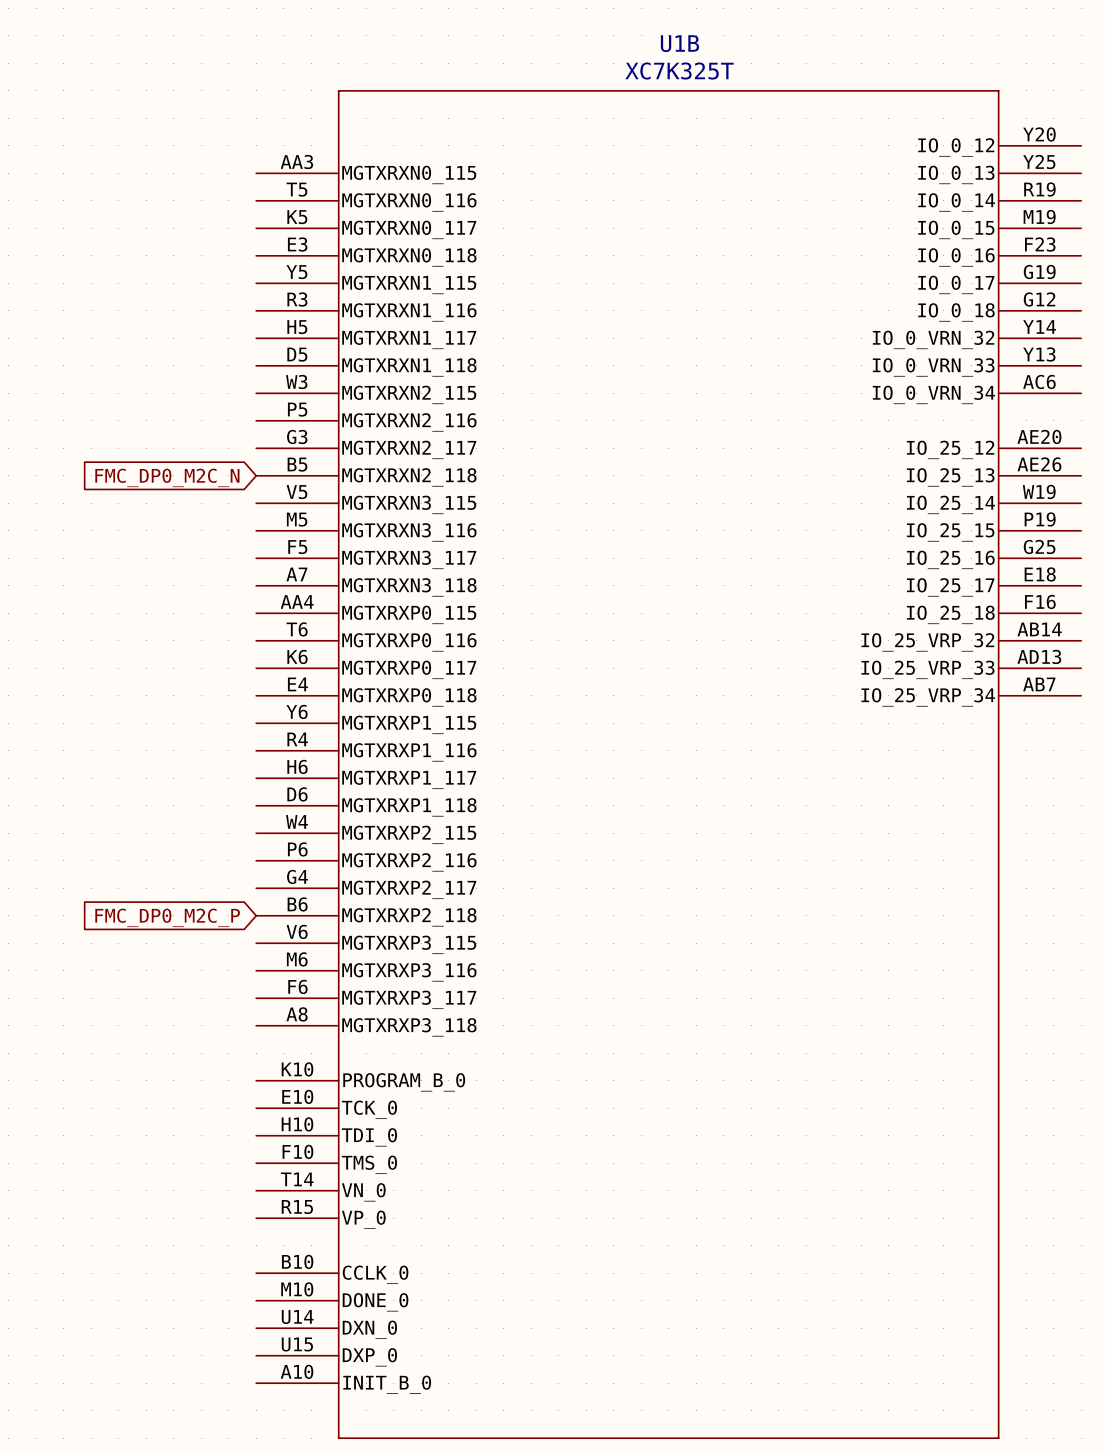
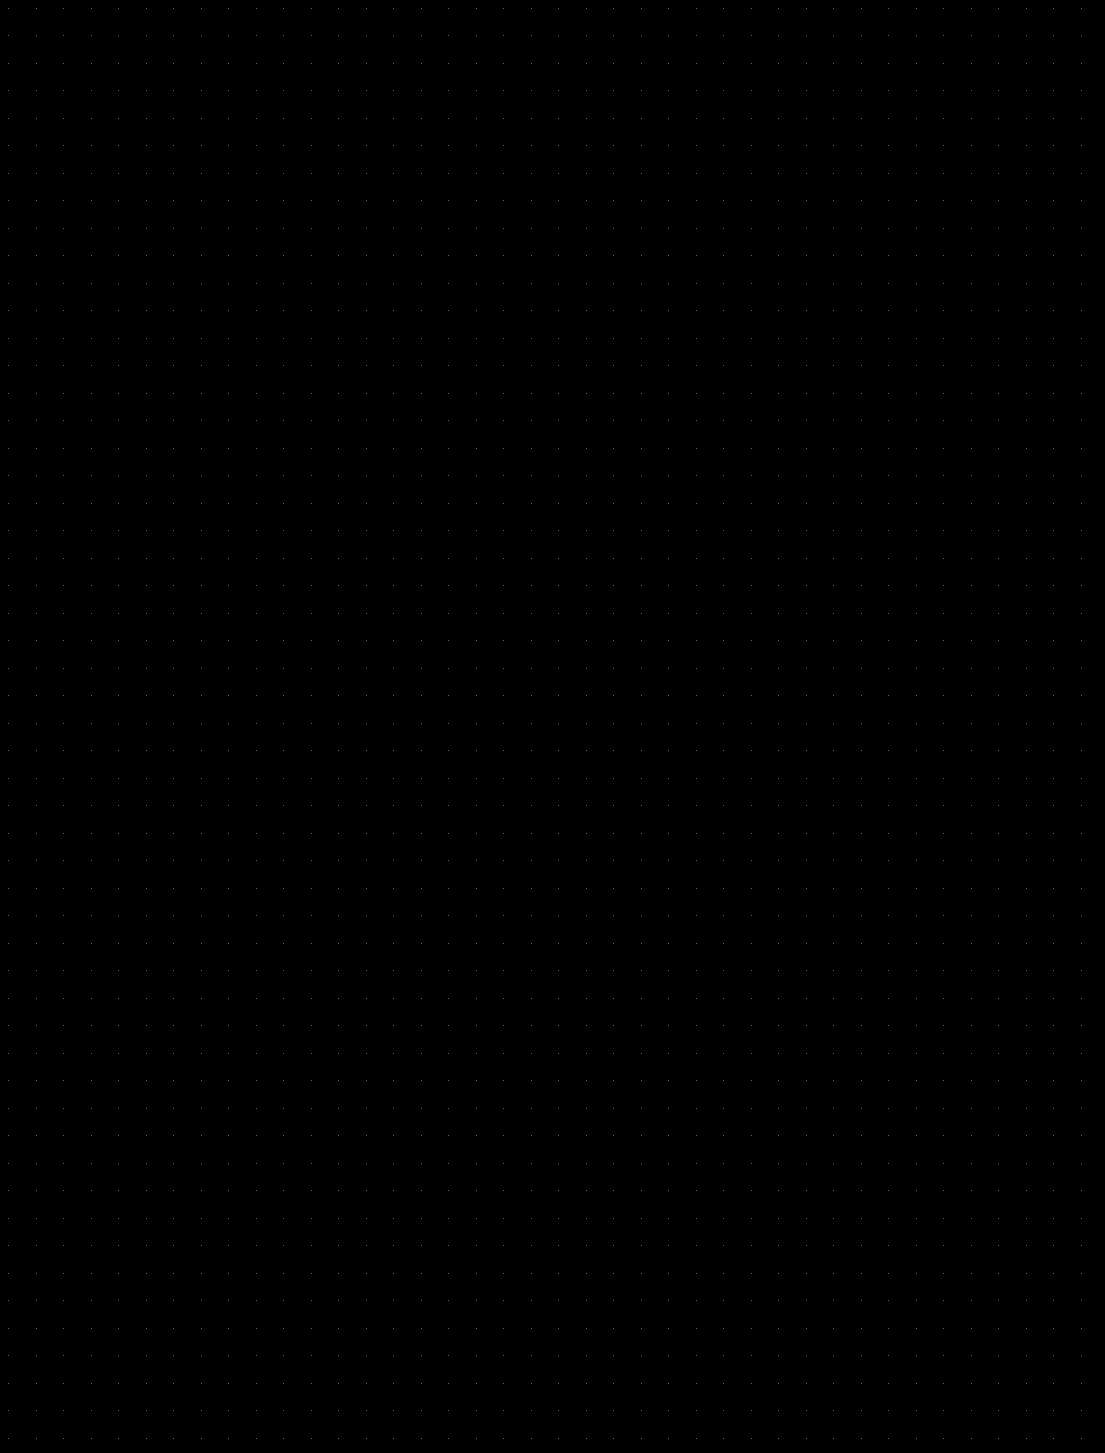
global label: FMC_DP0_M2C_N (167, 477) -> none
U1B: XC7K325T (668, 764) -> none
global label: FMC_DP0_M2C_P (167, 917) -> none

